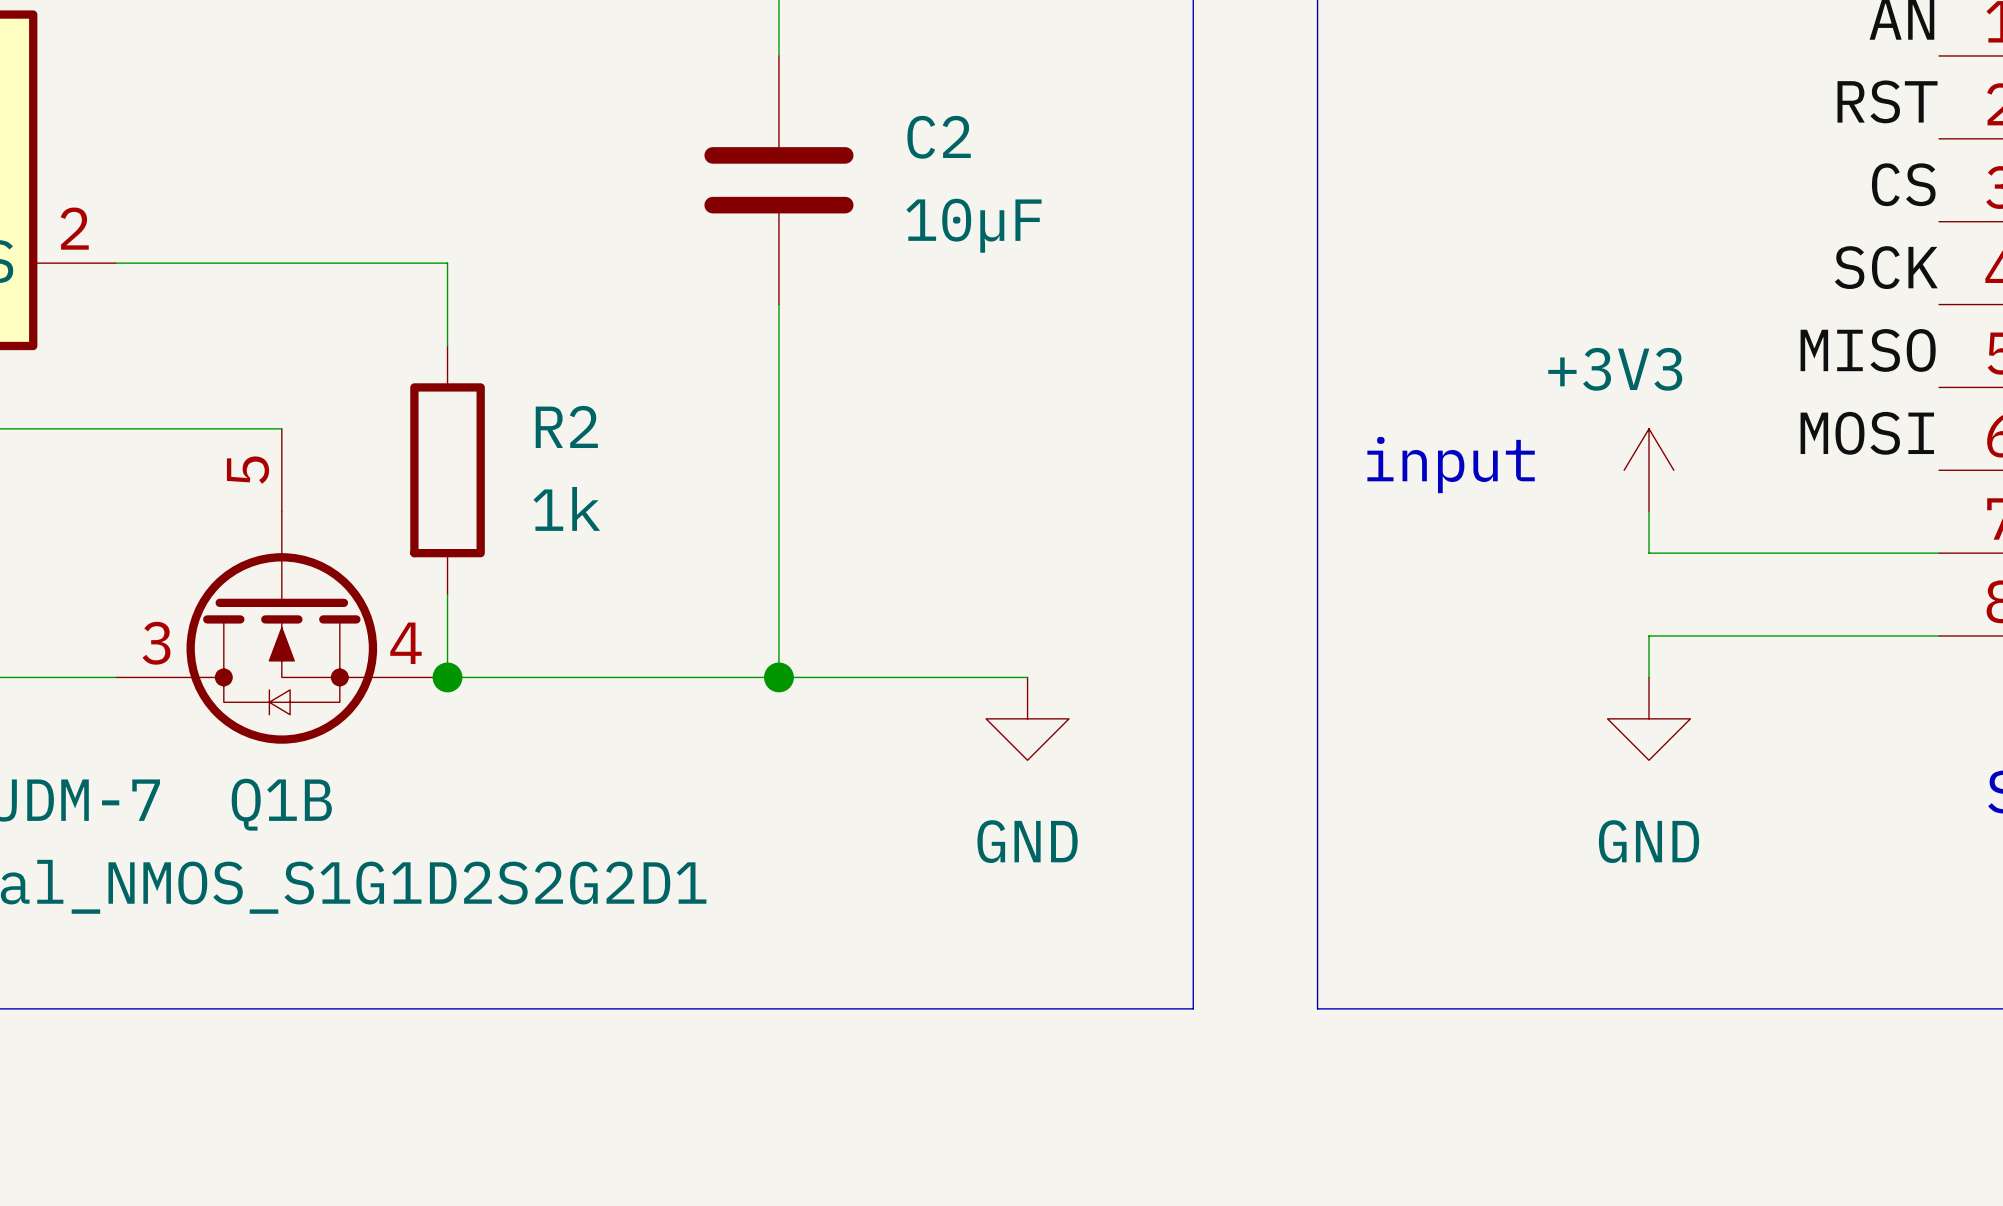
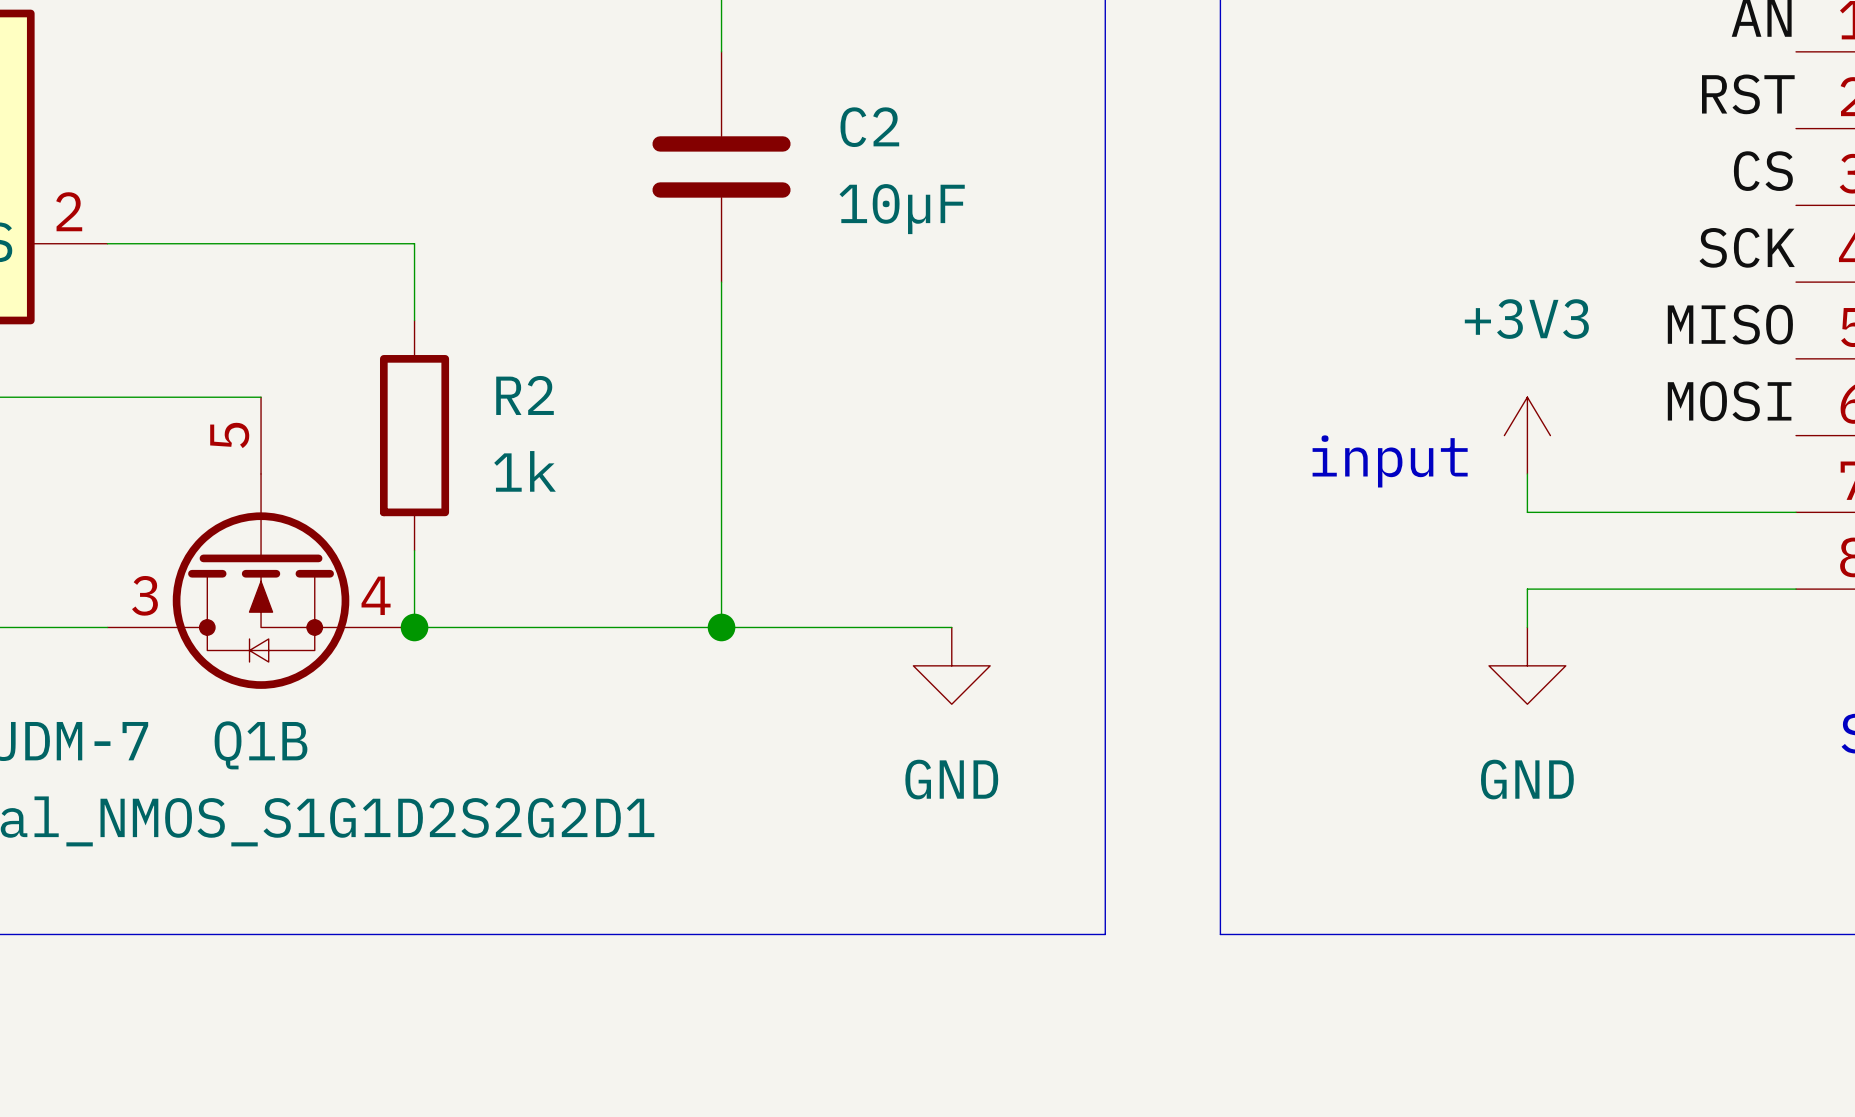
power symbol text position: +3V3 (1615, 369) -> +3V3 (1526, 319)
text position: input (1451, 465) -> input (1390, 461)

